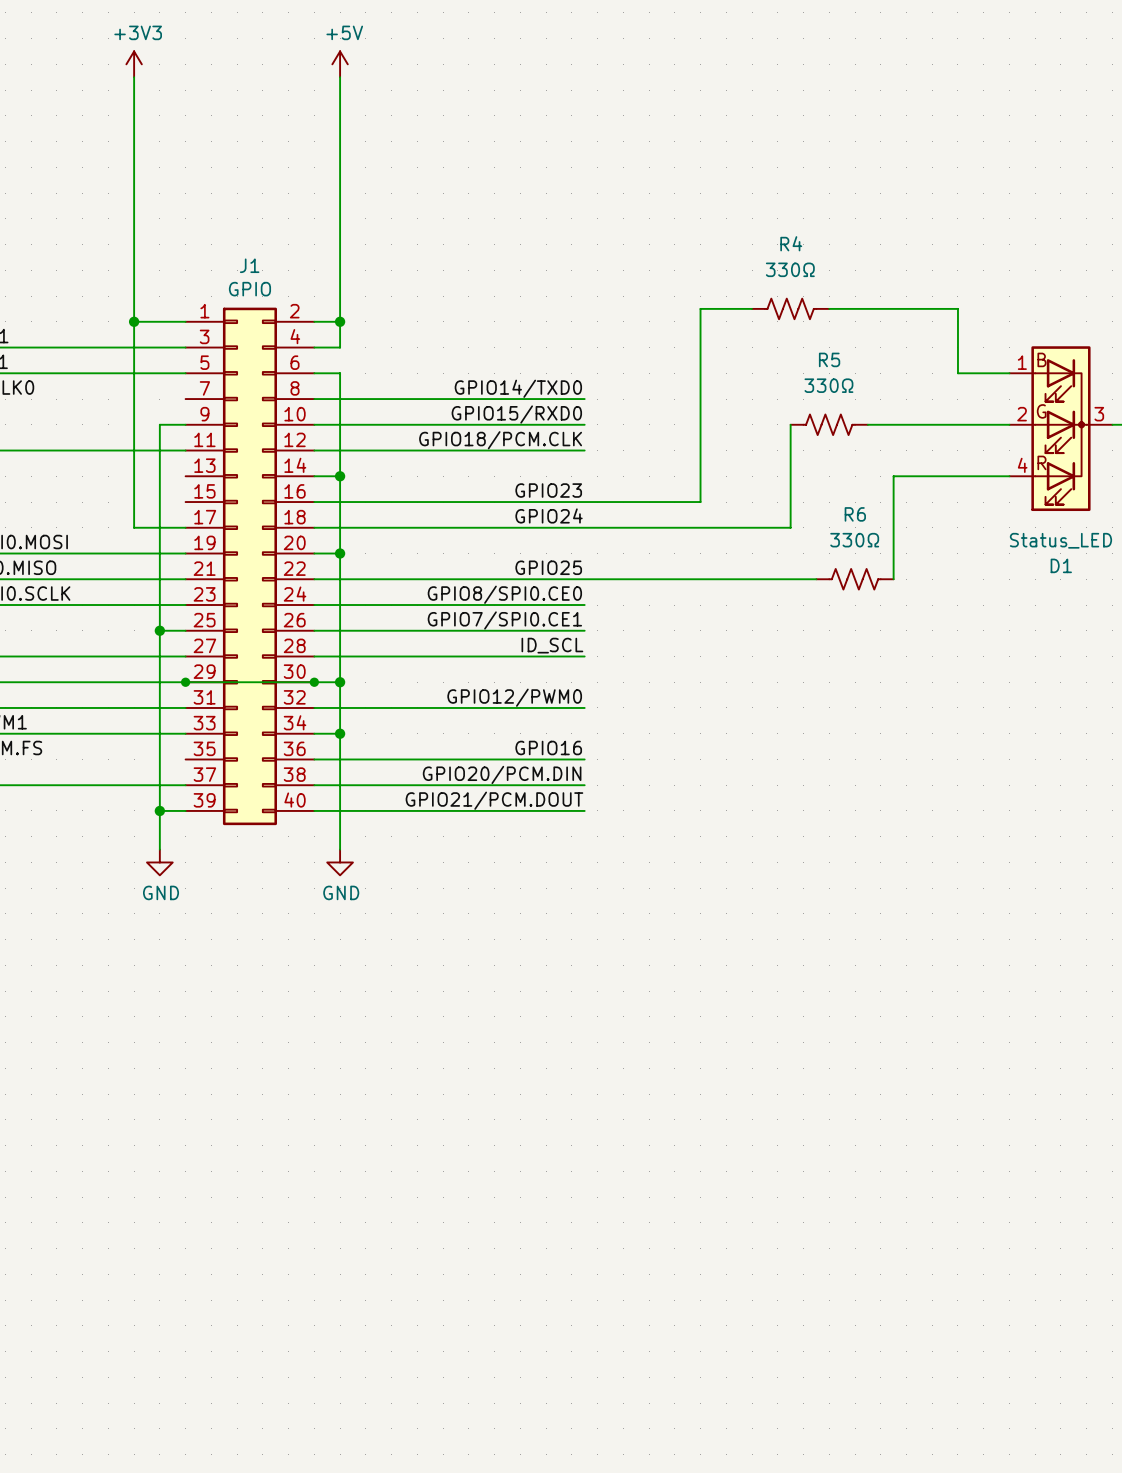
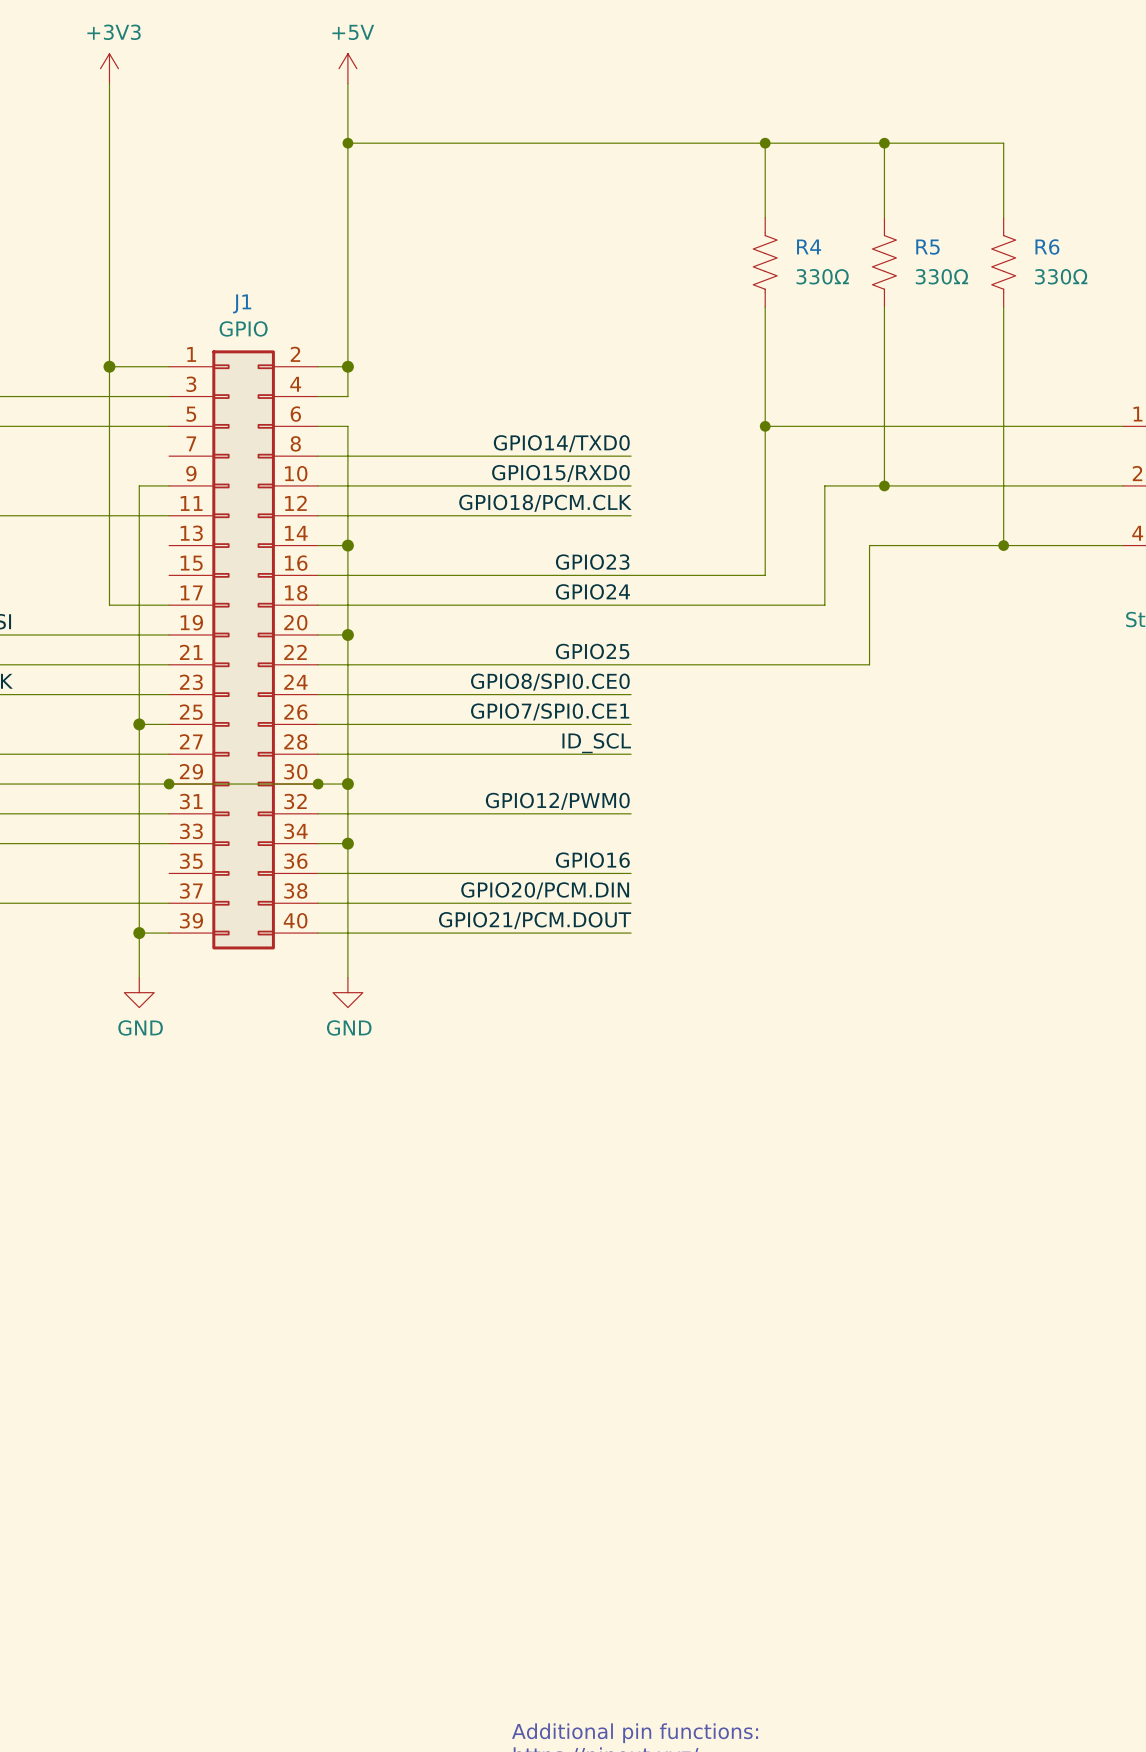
wire: none -> (347, 143) (1003, 143) (1003, 217)
junction: none -> (347, 143)
wire: none -> (765, 143) (765, 217)
junction: none -> (765, 143)
wire: none -> (884, 143) (884, 217)
junction: none -> (884, 143)
R4 name position: R4 (791, 243) -> R4 (809, 246)
R4 value position: 330Ω (790, 269) -> 330Ω (822, 276)
wire: none -> (884, 307) (884, 485)
wire: none -> (1003, 307) (1003, 545)
wire: (700, 308) (752, 308) -> (765, 351) (765, 307)
R4 rotation: 0° (790, 308) -> 90° clockwise (765, 262)
R4 position: (790, 308) -> (765, 262)
wire: (829, 308) (957, 308) (957, 373) -> (765, 426) (1063, 426)
R5 name position: R5 (829, 359) -> R5 (927, 247)
junction: none -> (765, 426)
R5 value position: 330Ω (828, 385) -> 330Ω (941, 276)
wire: (790, 424) (790, 476) -> (988, 545) (869, 545)
junction: none -> (884, 485)
R5 rotation: 0° (829, 424) -> 90° clockwise (884, 262)
R5 position: (829, 424) -> (884, 262)
wire: (893, 476) (893, 579) -> none
junction: none -> (1003, 545)
R6 name position: R6 (855, 514) -> R6 (1047, 246)
wire: (752, 527) (790, 527) -> (824, 605) (824, 485) (958, 485)
R6 value position: 330Ω (854, 540) -> 330Ω (1061, 276)
wire: (790, 579) (816, 579) -> (869, 664) (869, 605)
R6 rotation: 0° (855, 579) -> 90° clockwise (1003, 262)
R6 position: (855, 579) -> (1003, 262)

